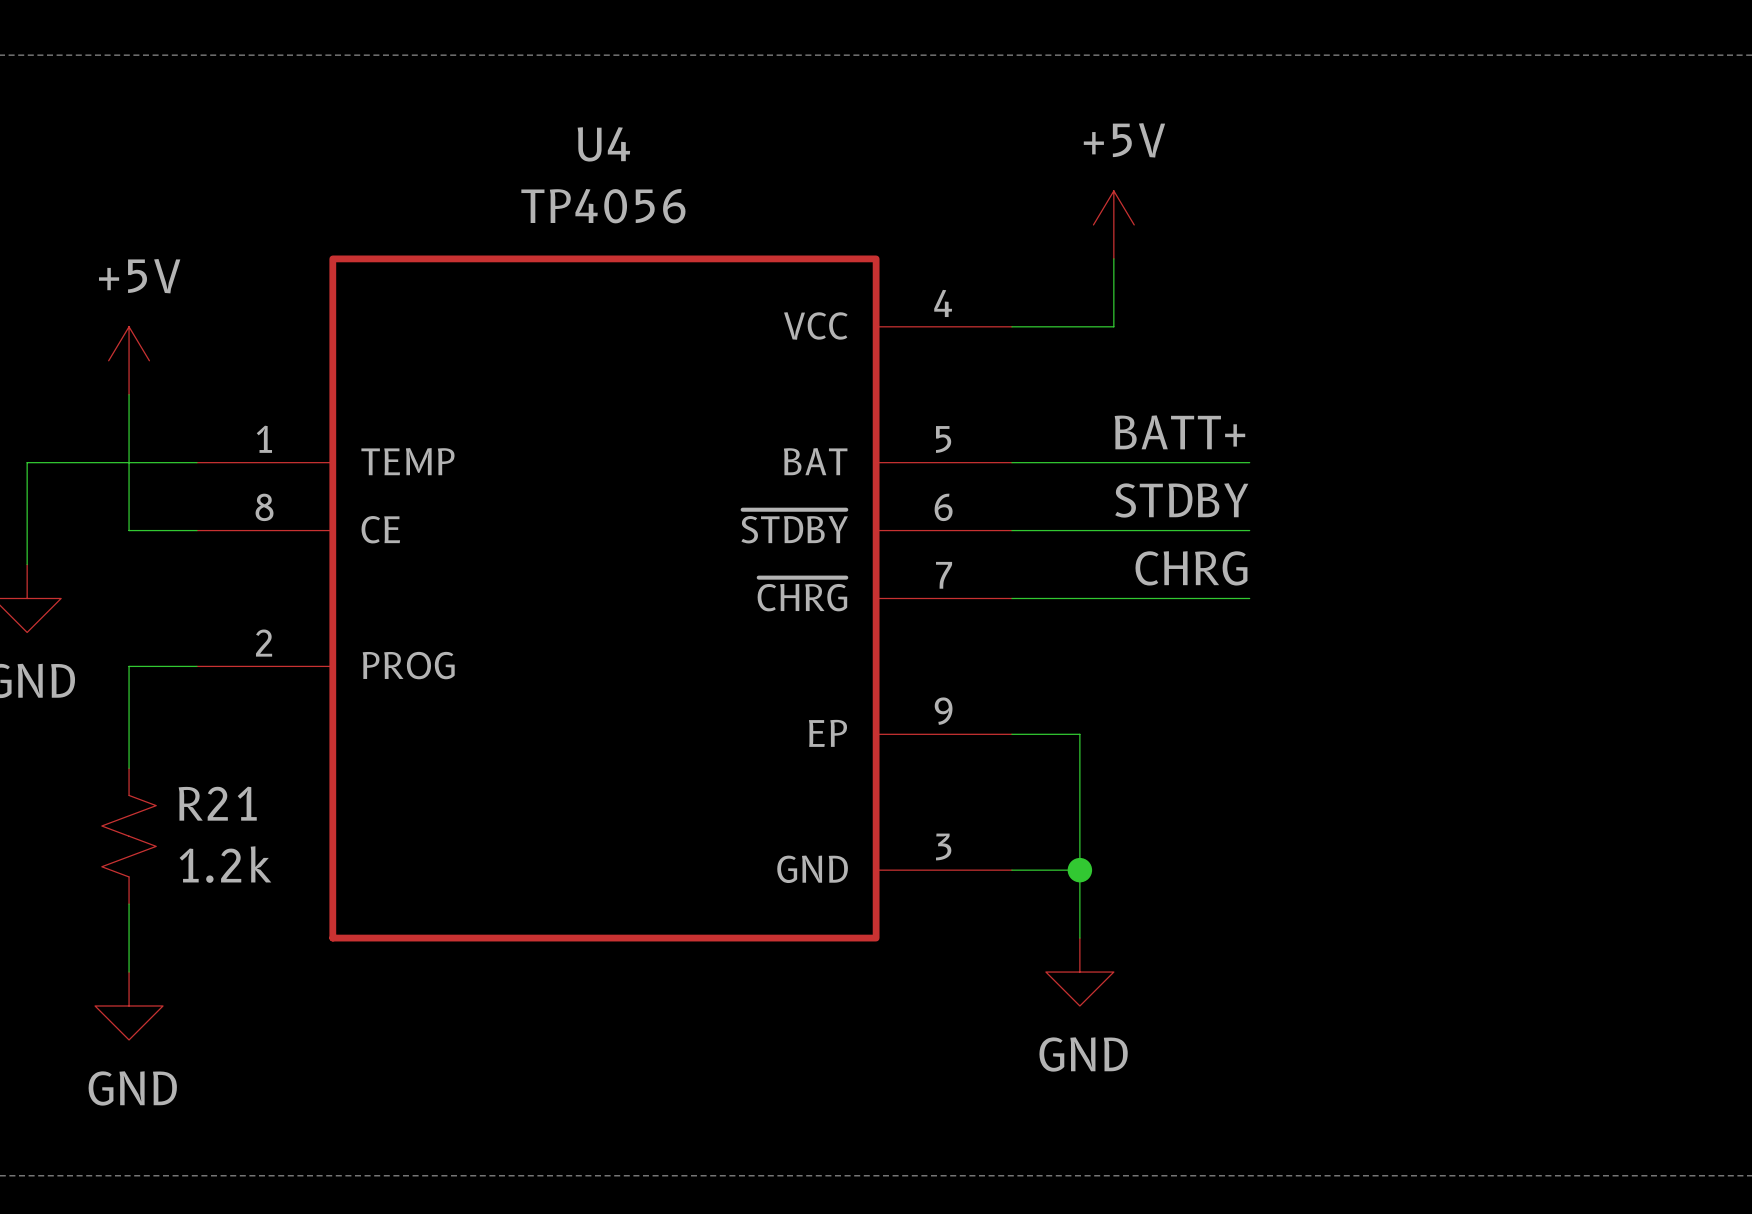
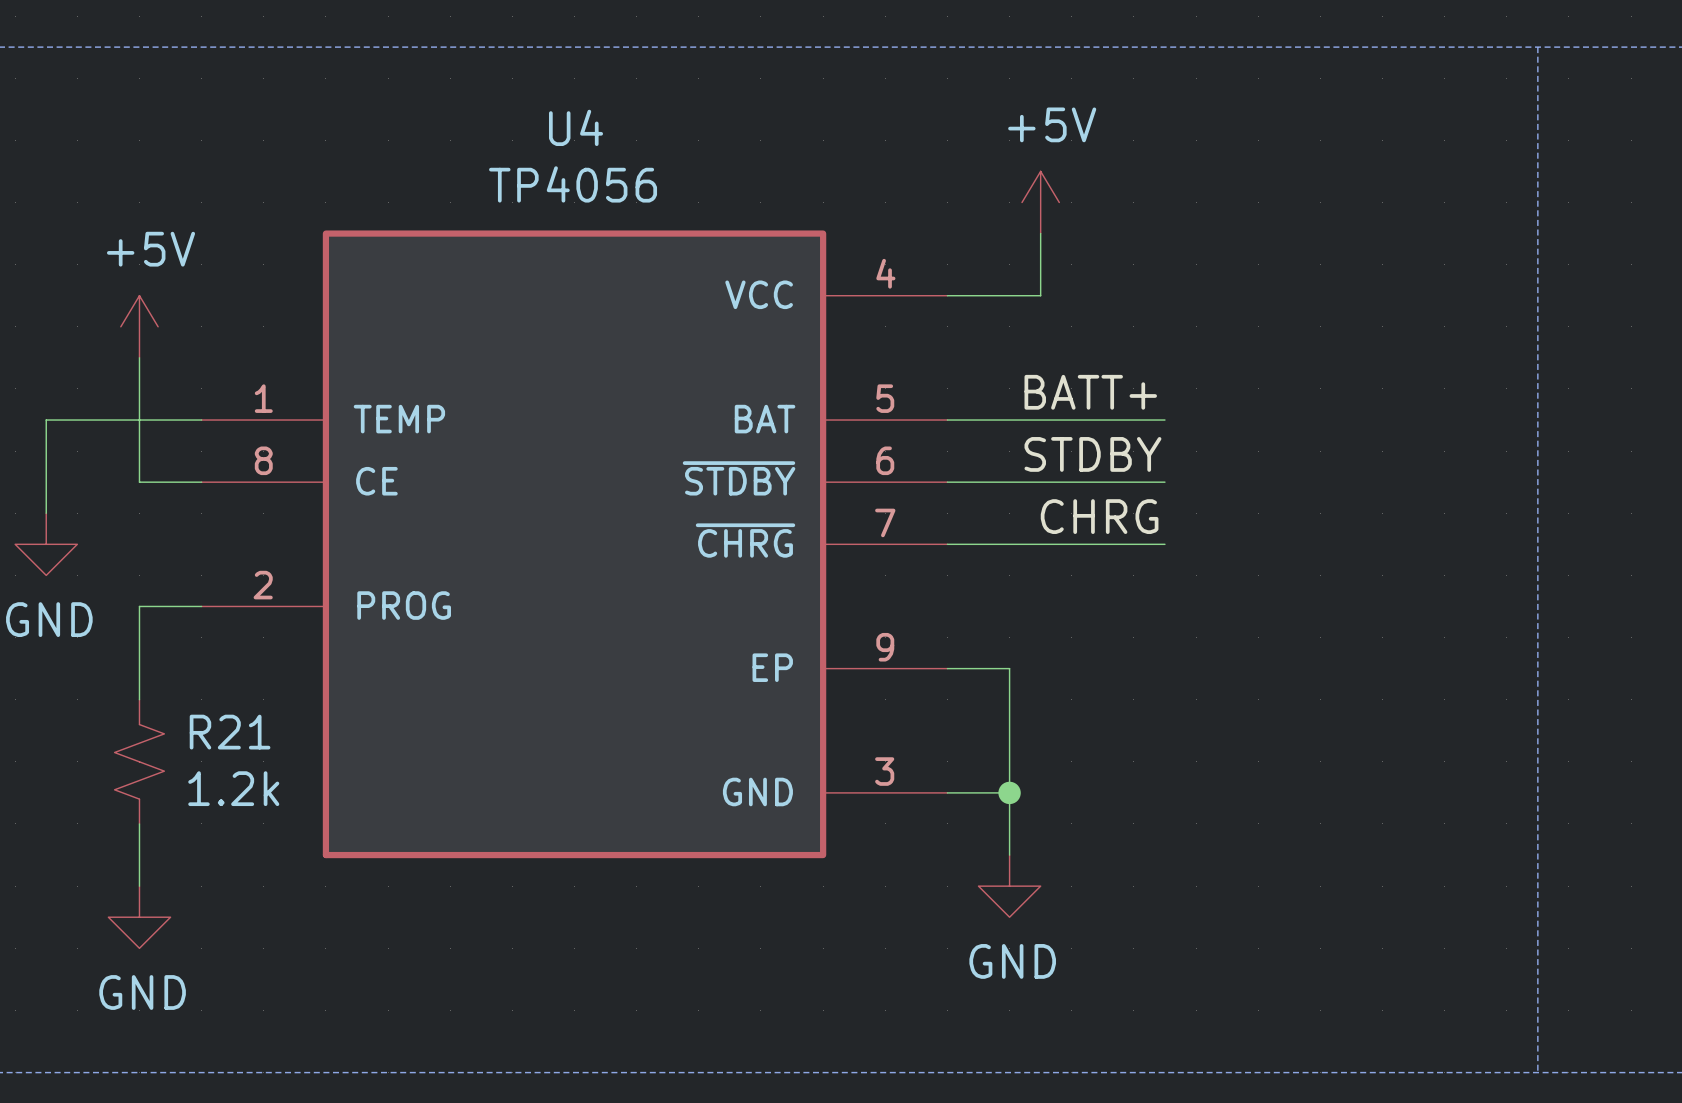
line: none -> (1537, 47) (1537, 1072)

